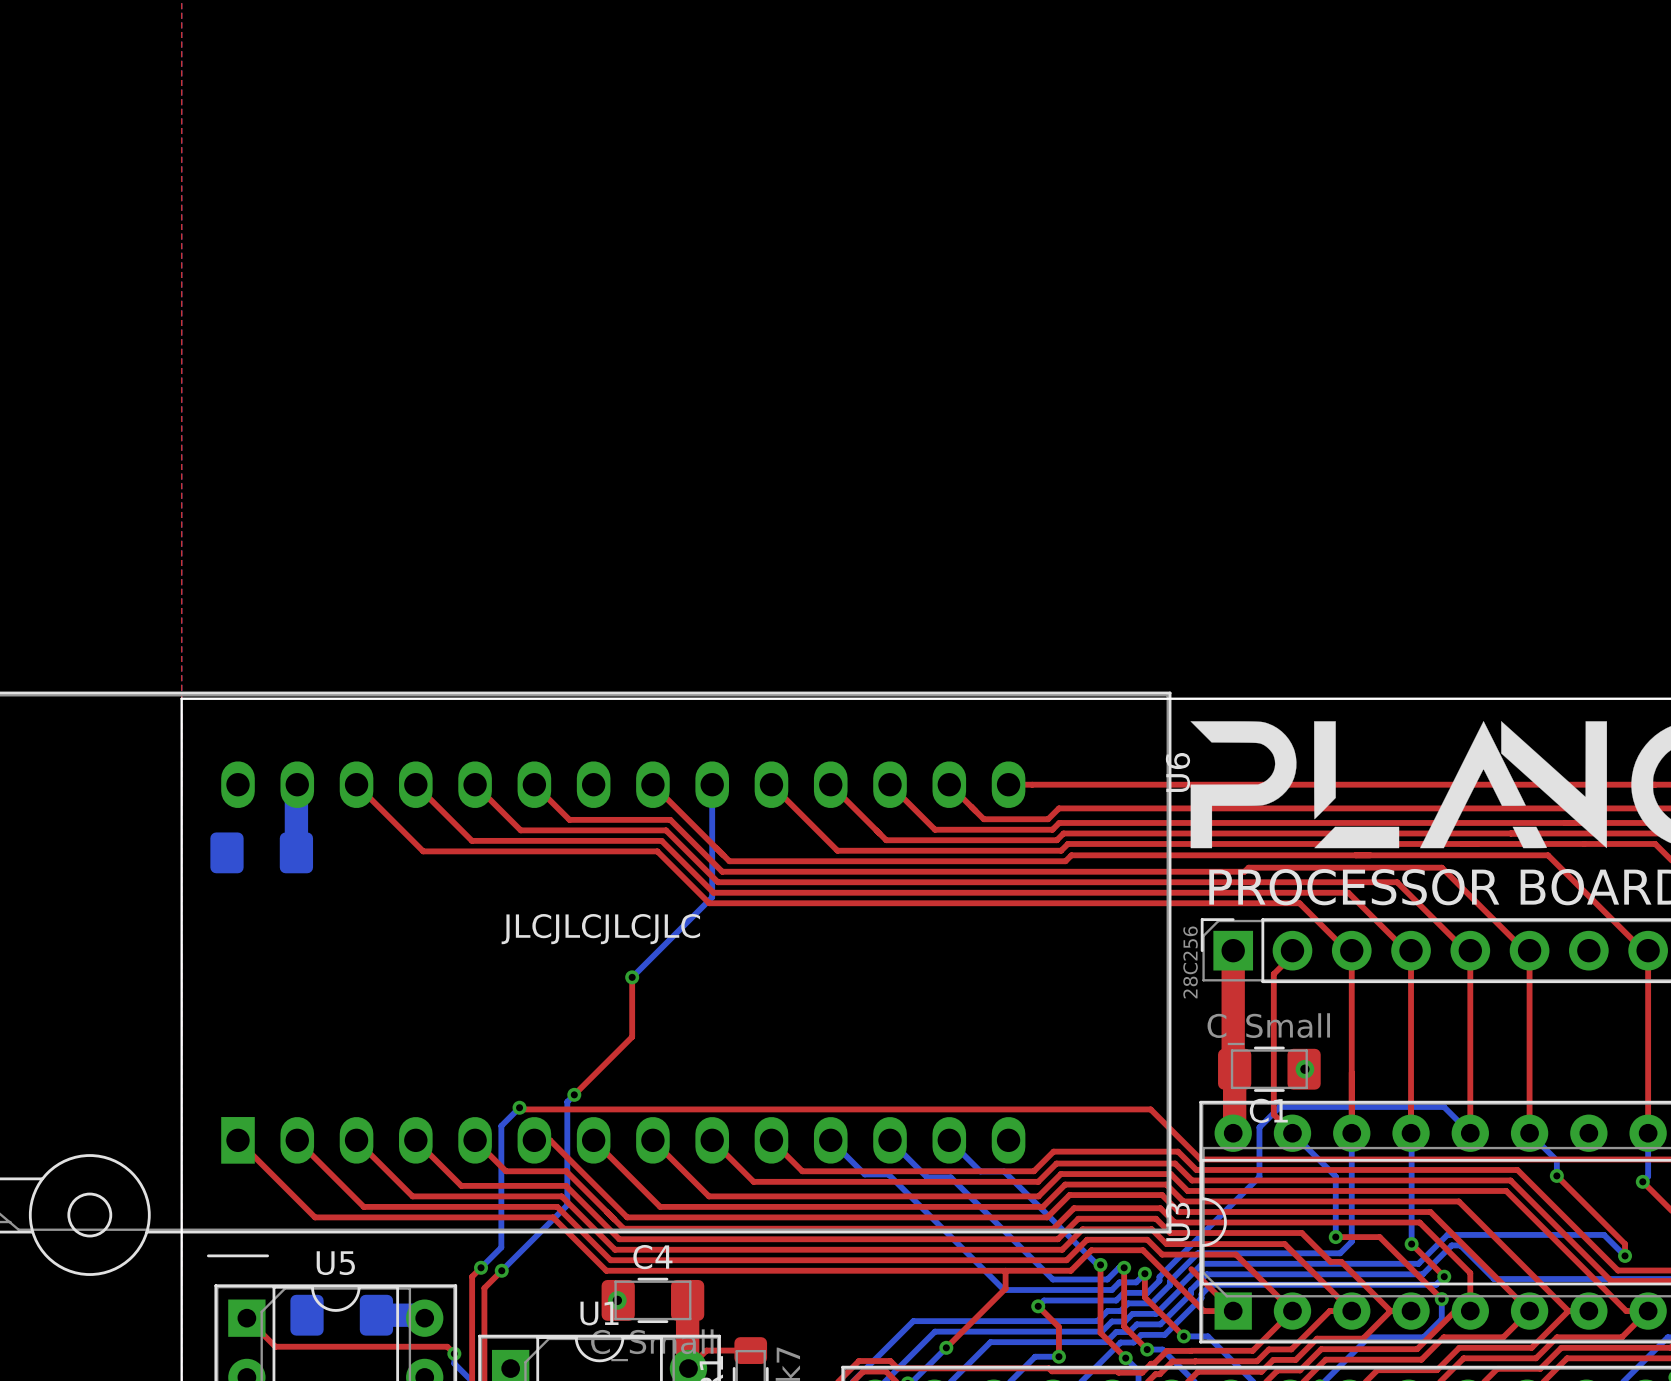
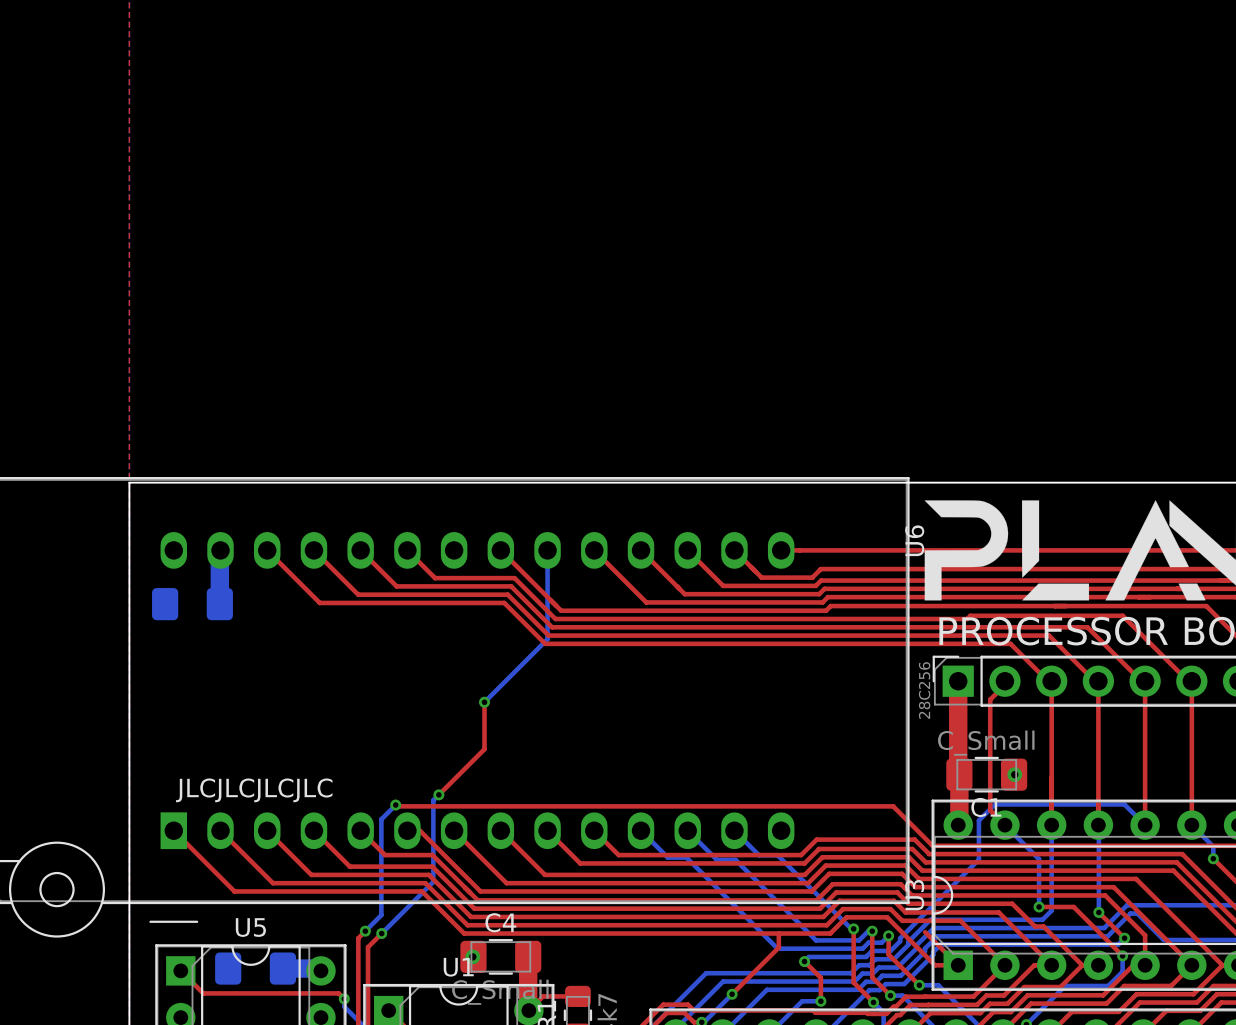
text position: JLCJLCJLCJLC (600, 929) -> JLCJLCJLCJLC (254, 790)

